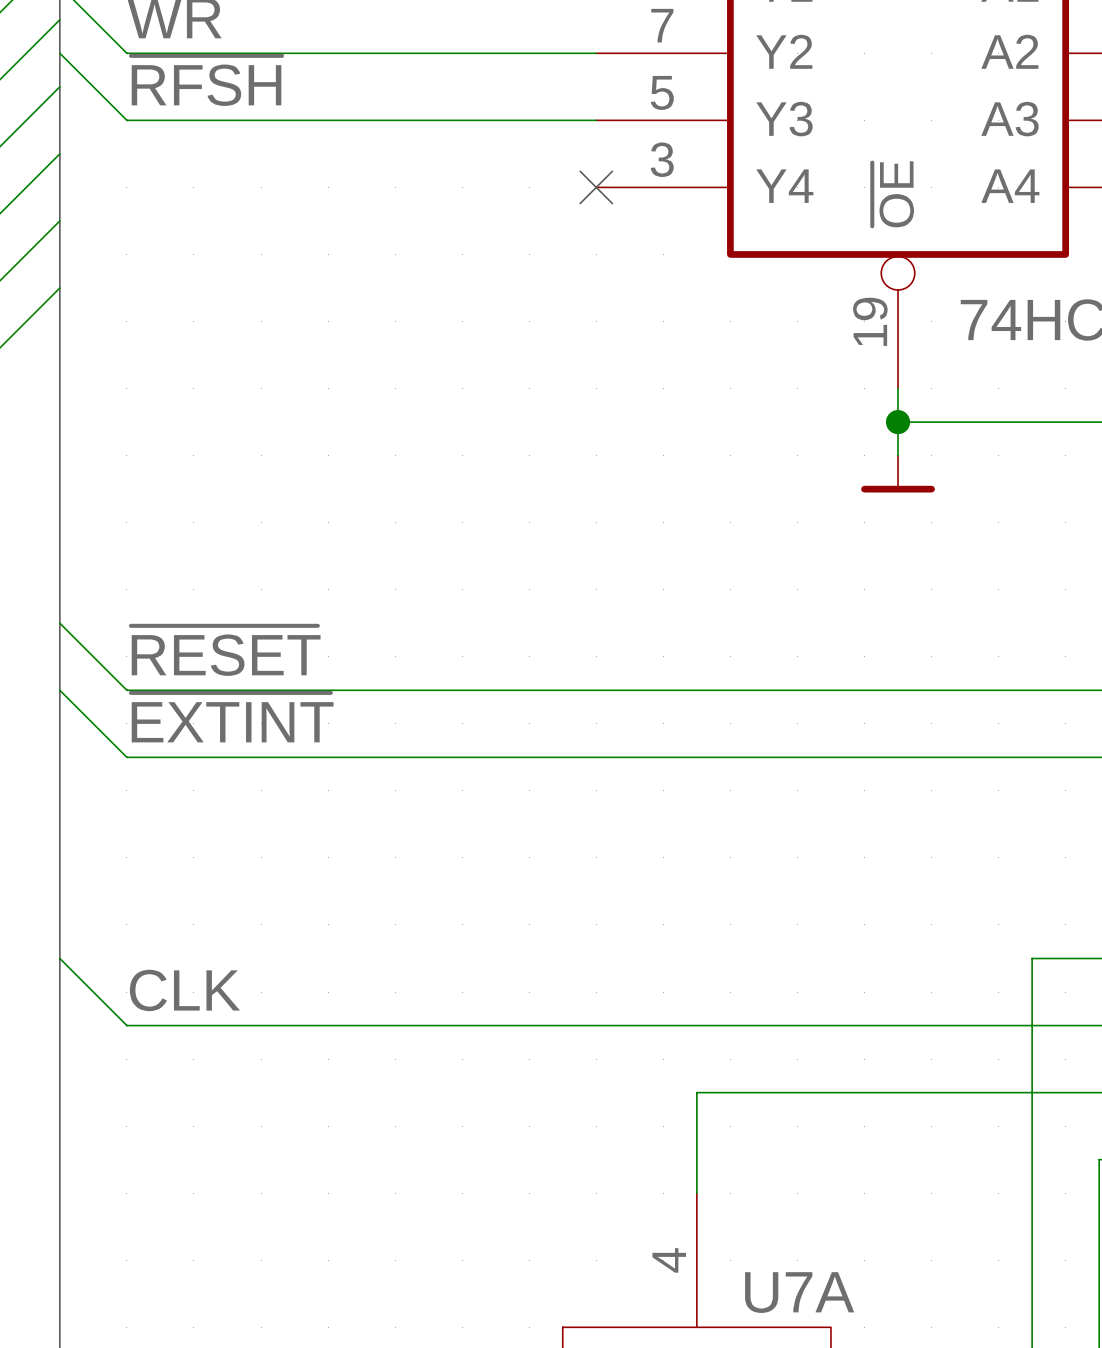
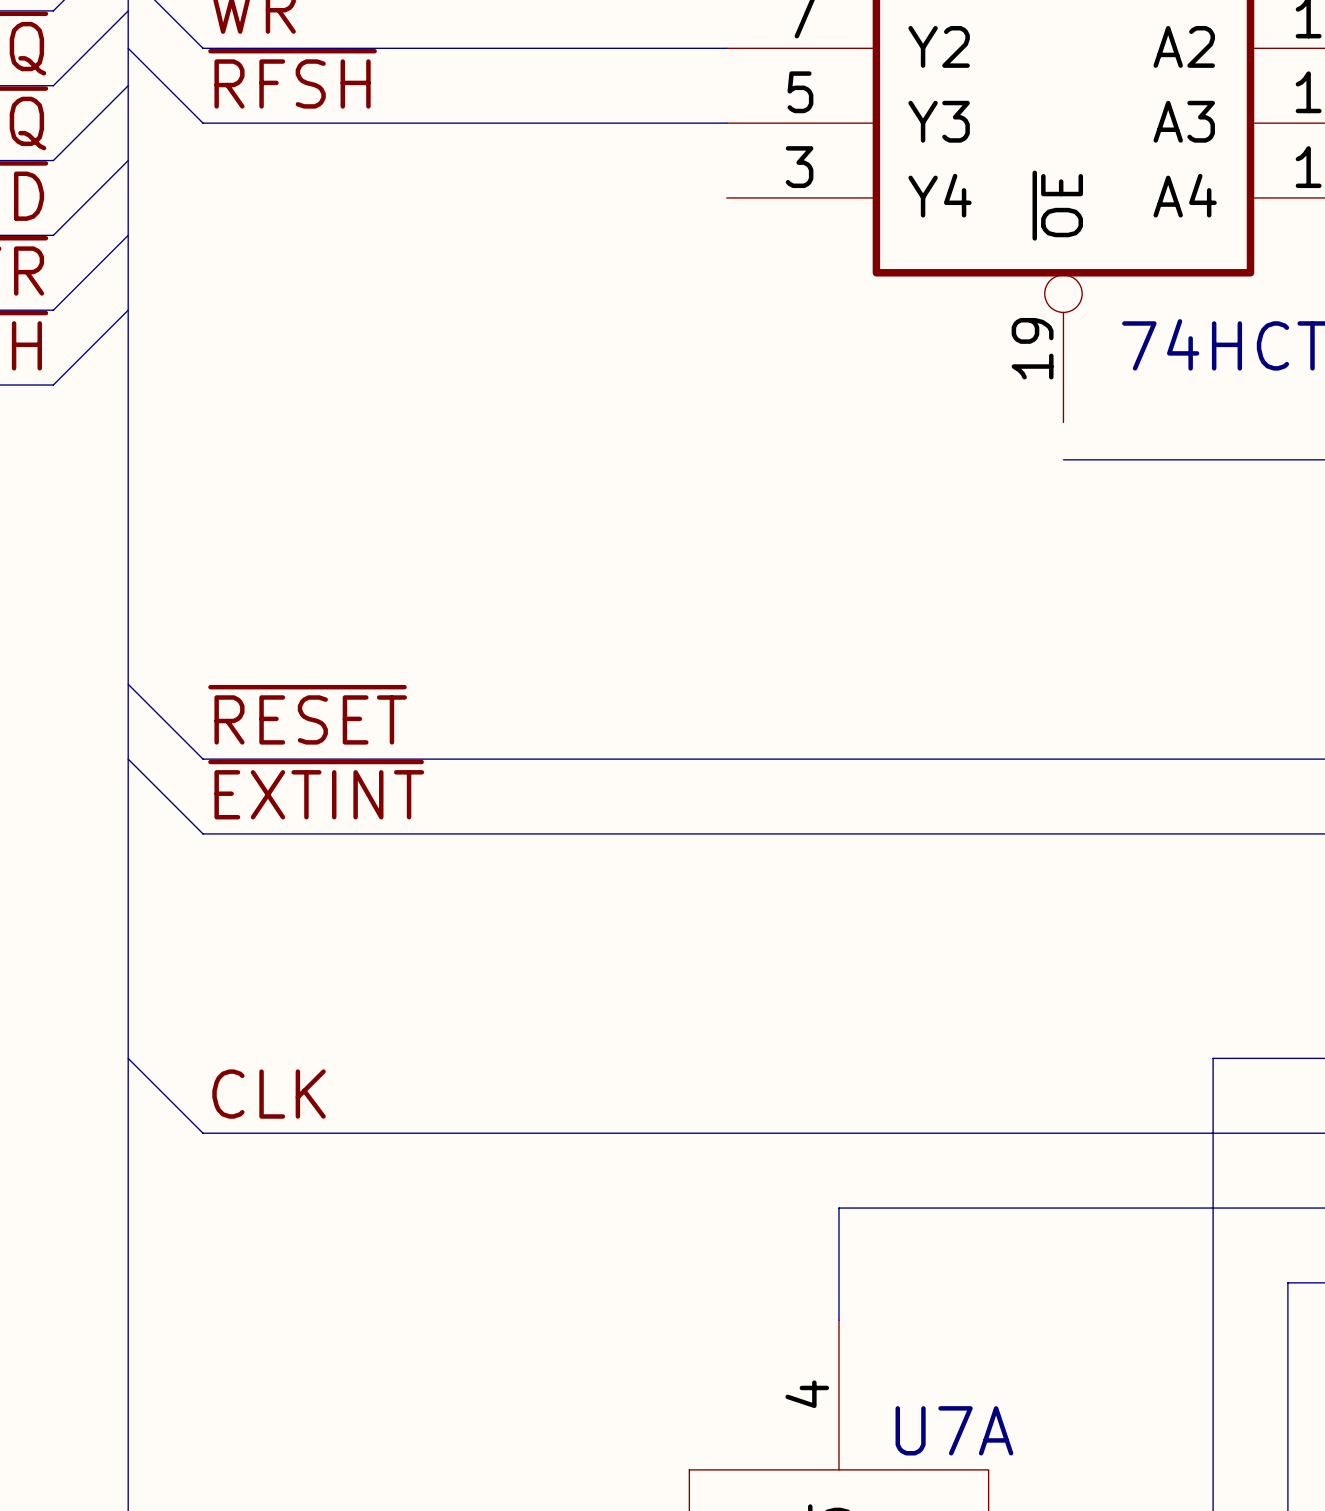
no-connect mark: (596, 187) -> none
wire: (898, 388) (898, 455) -> none
junction: (898, 422) -> none
power symbol: (898, 474) -> none

